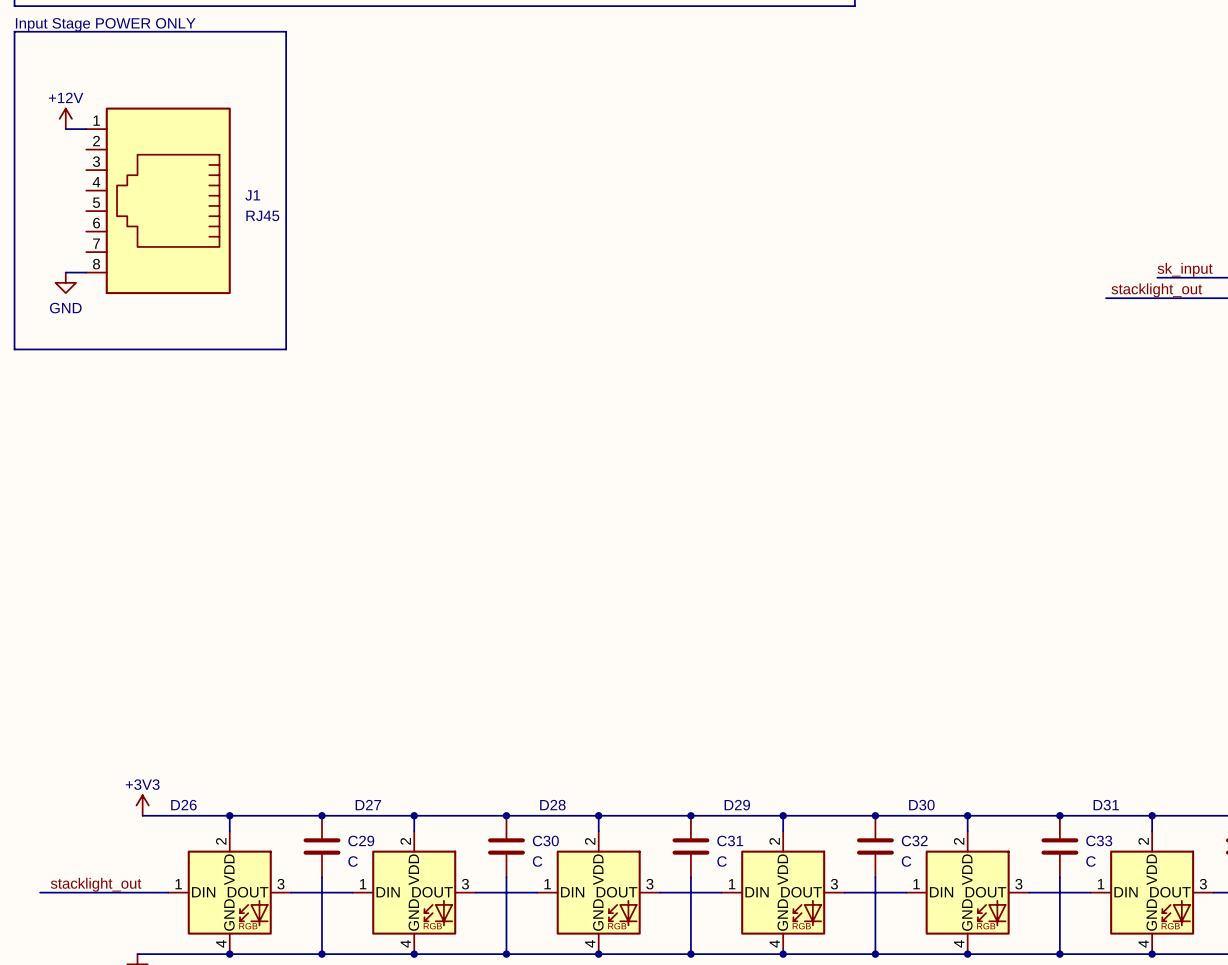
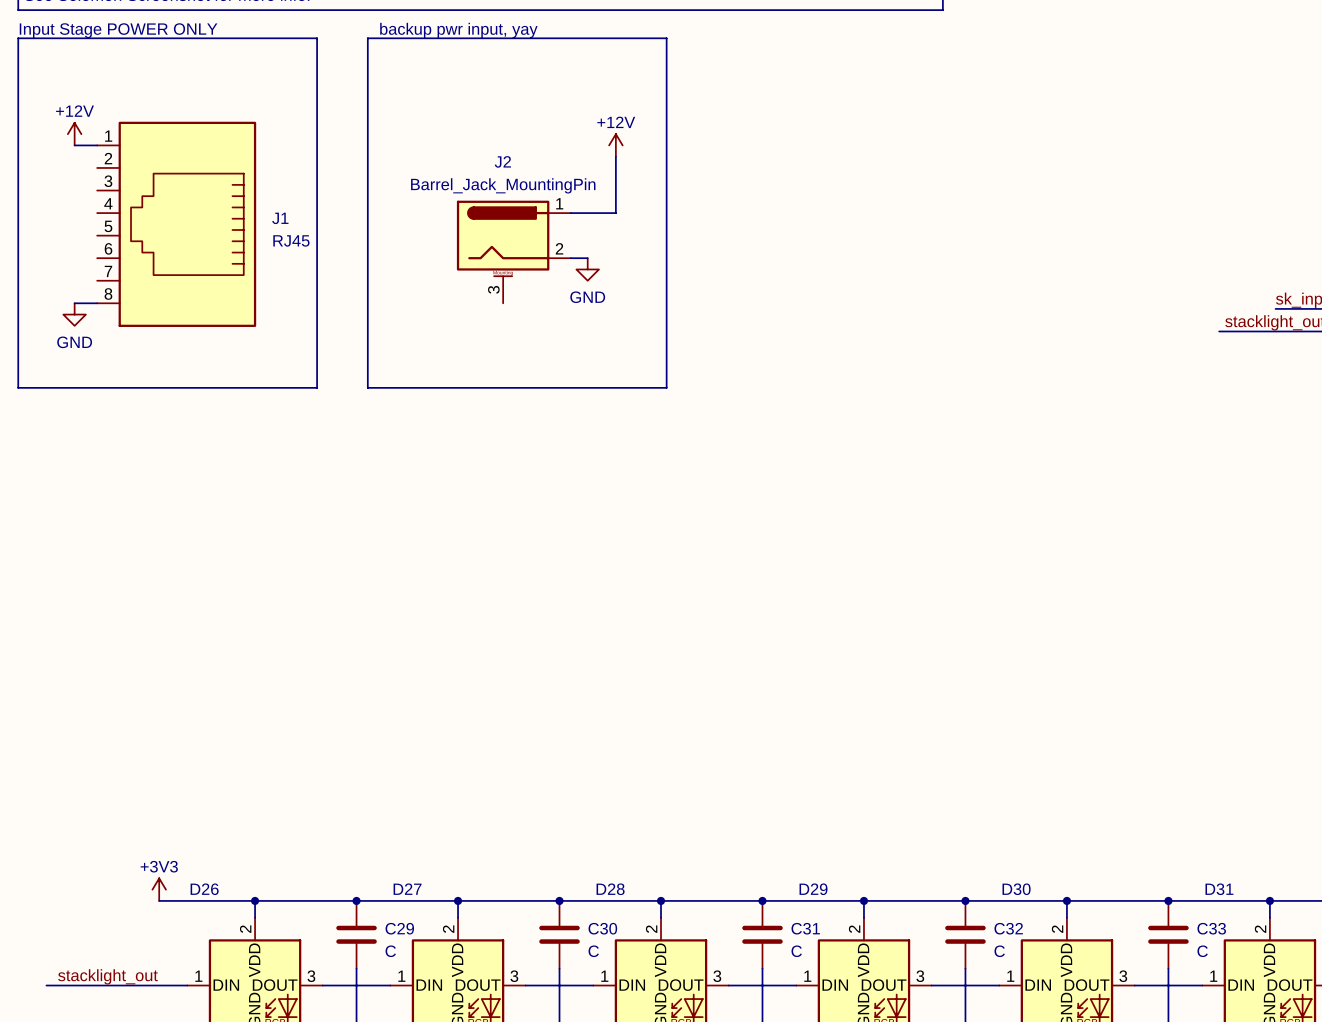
text: none -> backup pwr input, yay (458, 30)
line: none -> (367, 38) (666, 38) (666, 387) (367, 387) (367, 38)
power symbol: none -> +12V (615, 145)
wire: none -> (615, 156) (615, 213) (570, 213)
J2: none -> Barrel_Jack_MountingPin (513, 251)
wire: none -> (570, 258) (587, 258)
power symbol: none -> GND (587, 269)

